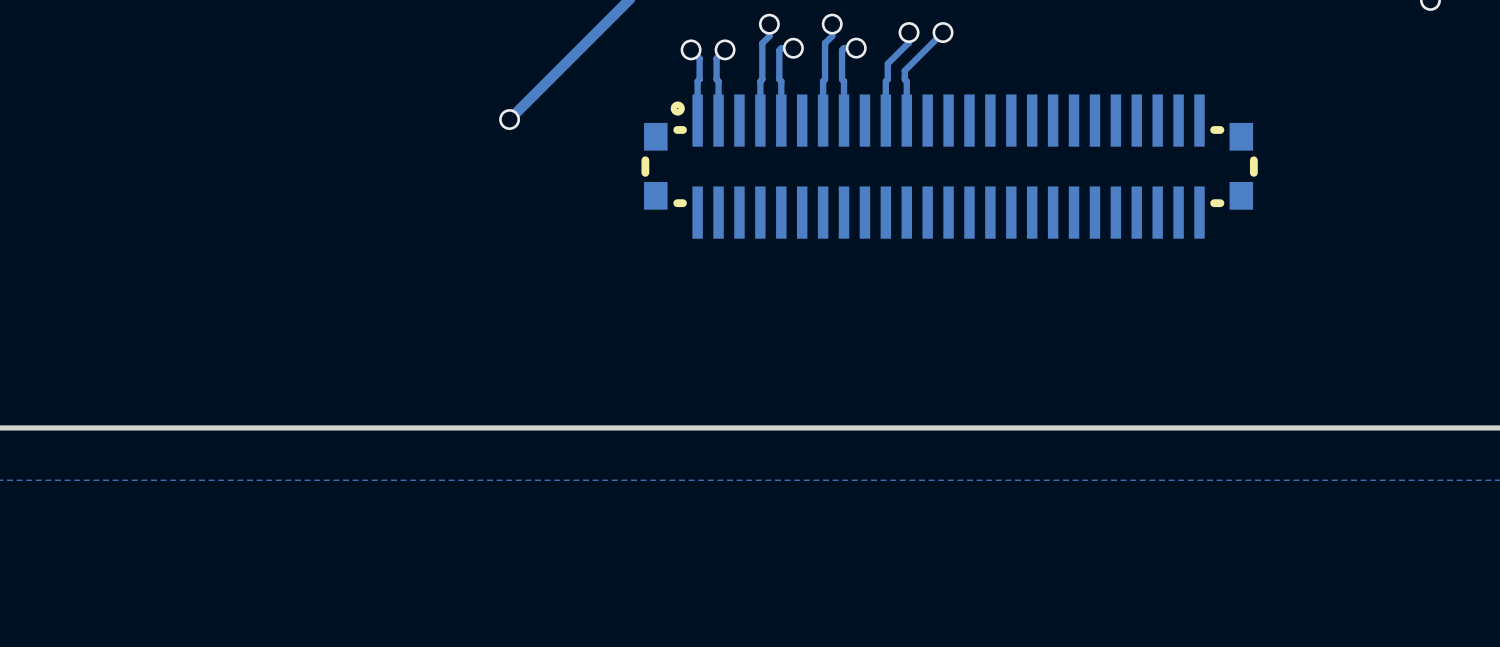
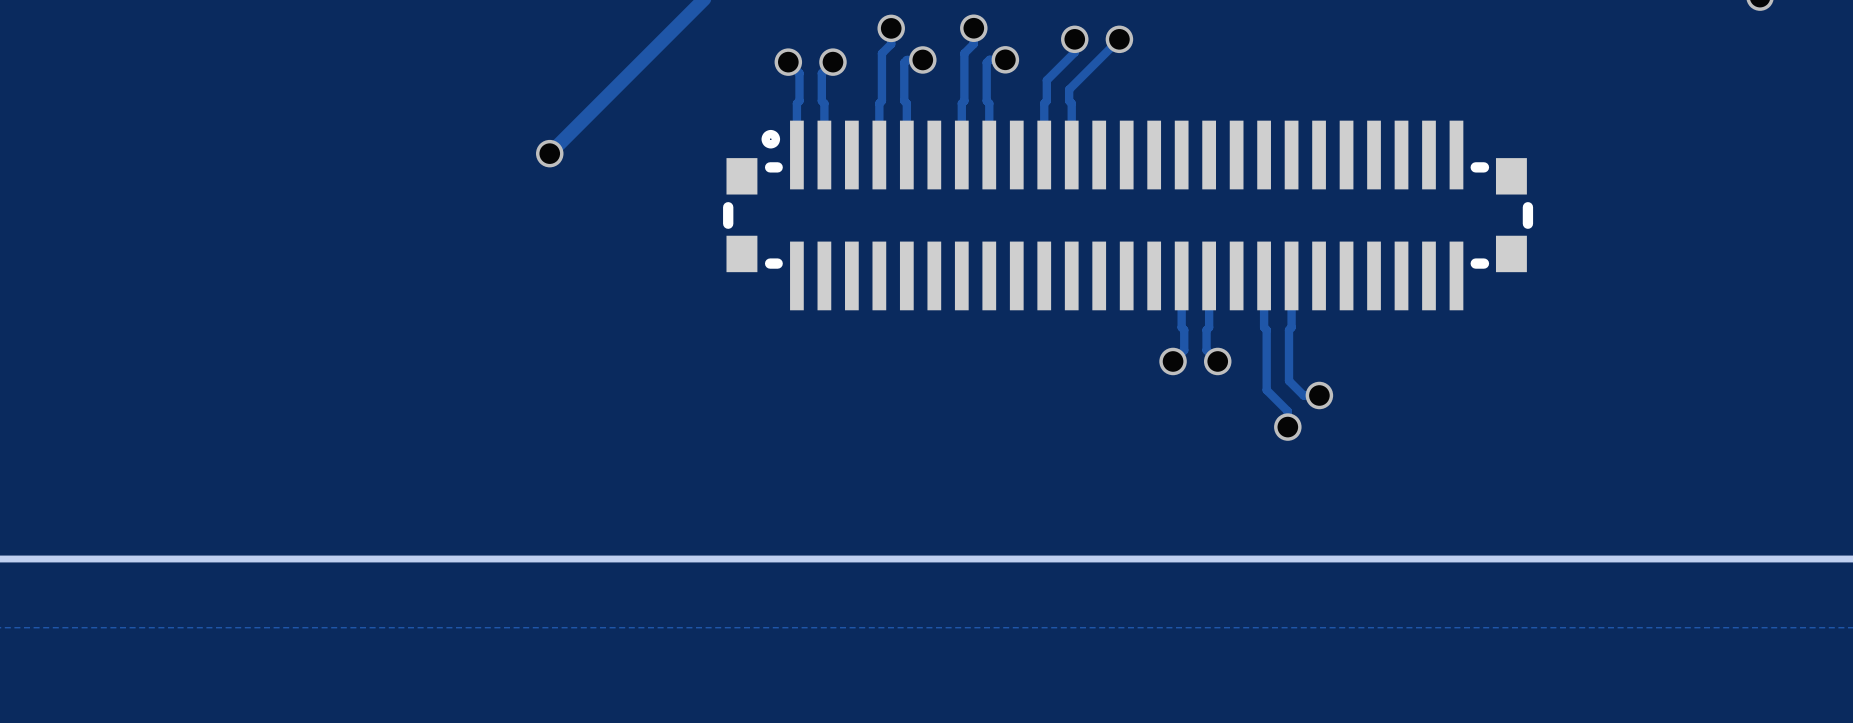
track: none -> (1181, 275) (1181, 327) (1184, 330) (1184, 350) (1173, 361)
track: none -> (1209, 275) (1209, 327) (1206, 330) (1206, 350) (1217, 361)
track: none -> (1264, 275) (1266, 390) (1287, 411) (1287, 427)
track: none -> (1291, 275) (1289, 380) (1303, 395) (1319, 395)
via: none -> (1173, 361)
via: none -> (1217, 361)
via: none -> (1319, 395)
via: none -> (1287, 427)

